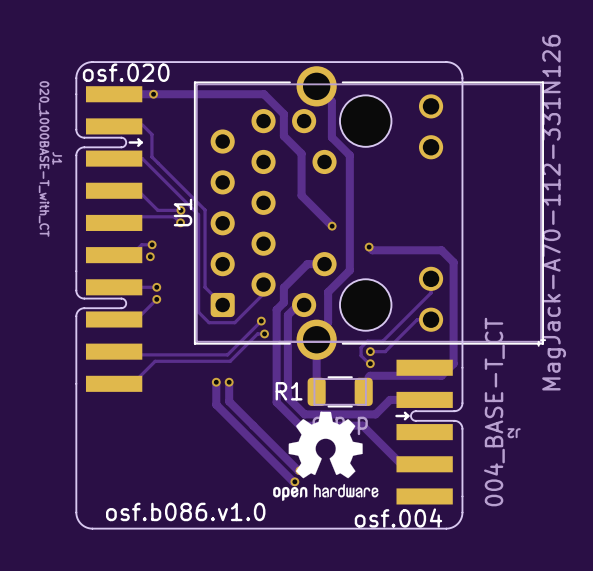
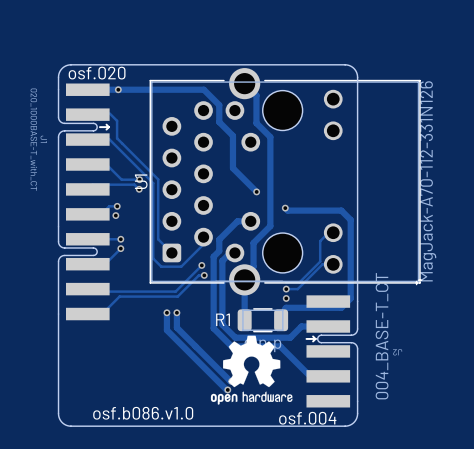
track: none -> (333, 227) (320, 241) (320, 261) (299, 282) (286, 282)
track: (431, 278) (431, 292) (382, 341) (367, 341) (361, 347) (361, 355) (370, 363) -> none

